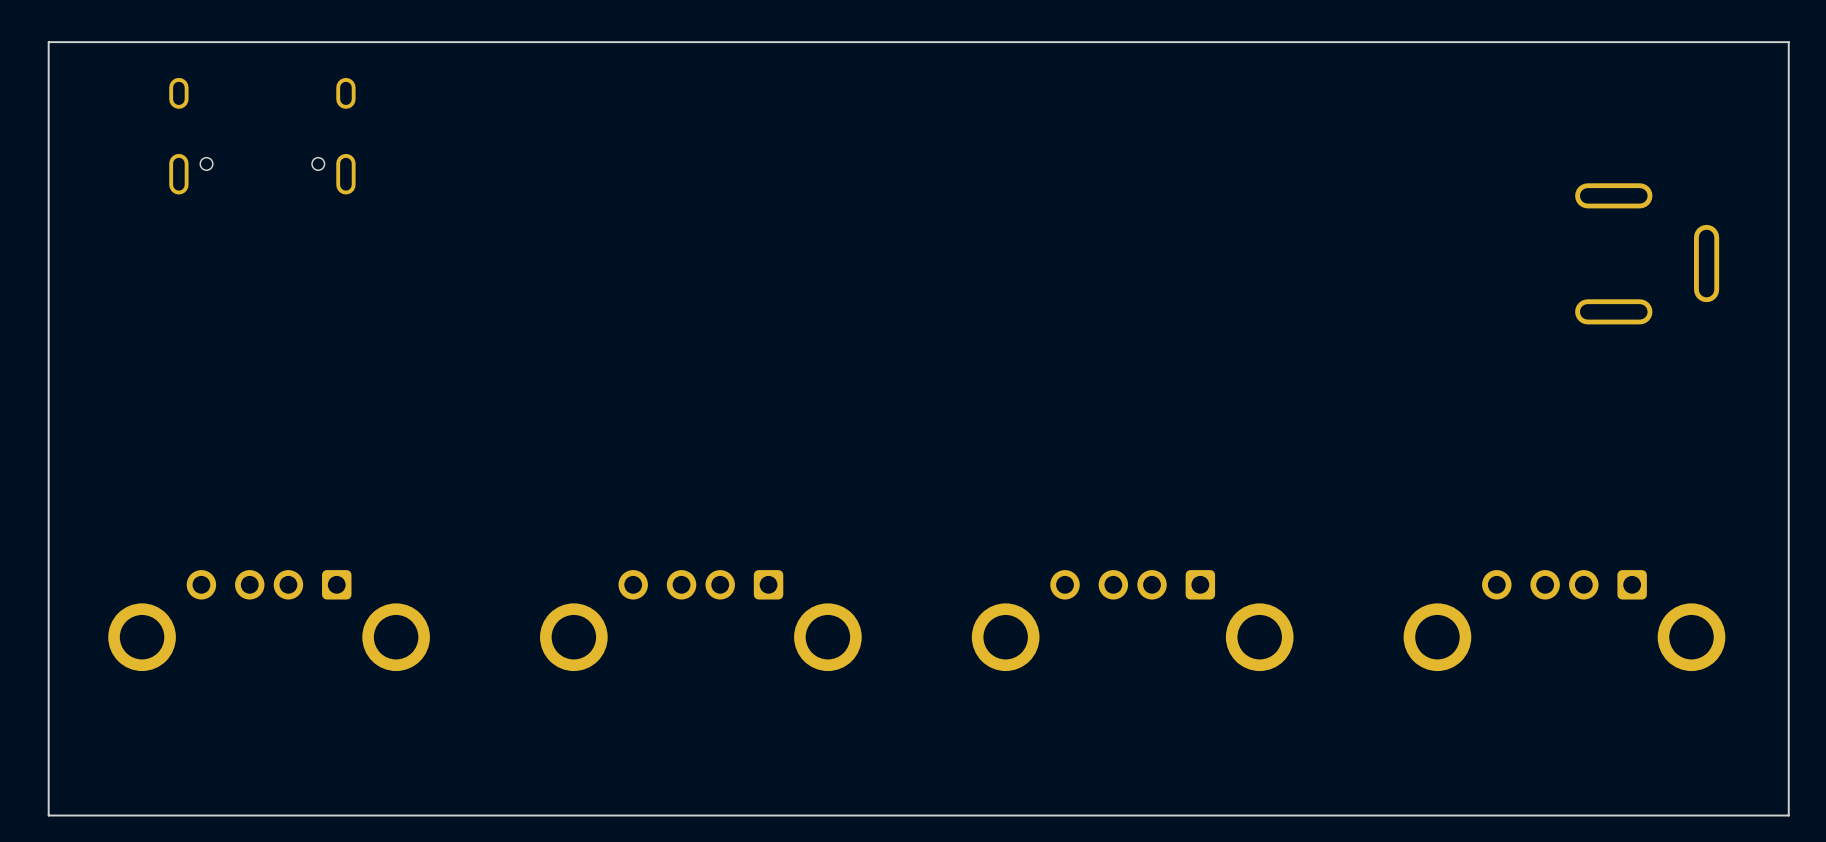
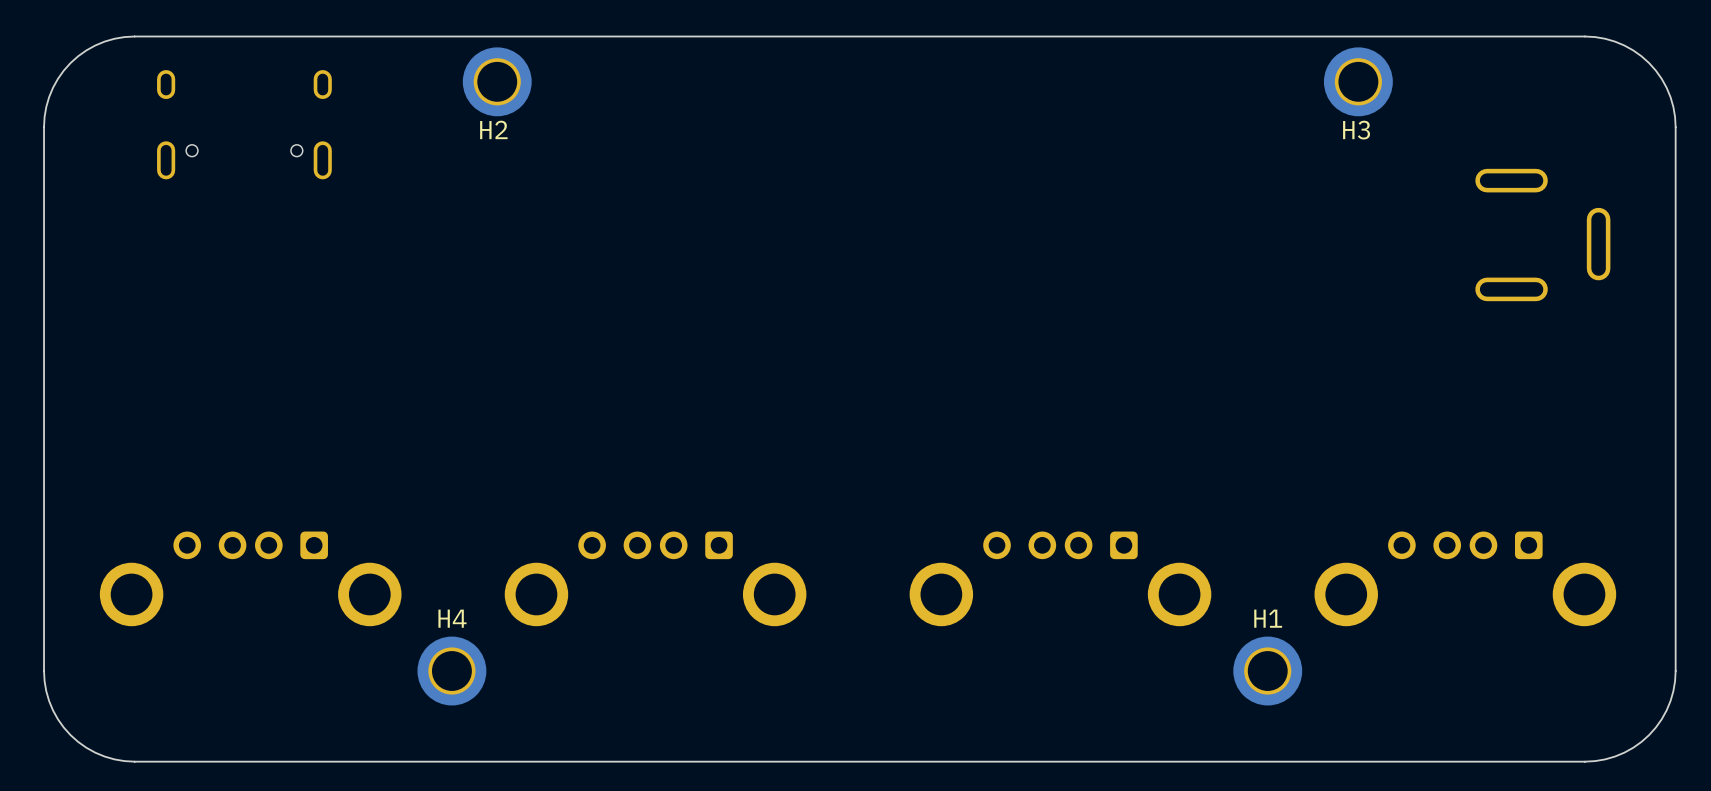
board edge: (145, 42) (48, 42) (48, 138) -> (134, 36) (114, 38) (95, 45) (70, 63) (57, 78) (49, 97) (44, 127)
board edge: (1692, 42) (1788, 42) (1788, 138) -> (1585, 36) (1614, 41) (1633, 50) (1649, 63) (1661, 78) (1670, 97) (1675, 127)
H2: none -> (497, 81)
H3: none -> (1358, 81)
board edge: (48, 718) (48, 815) (145, 815) -> (44, 671) (49, 700) (57, 719) (70, 735) (86, 747) (104, 756) (134, 761)
H4: none -> (451, 671)
H1: none -> (1267, 671)
board edge: (1788, 718) (1788, 815) (1692, 815) -> (1675, 671) (1673, 691) (1666, 710) (1649, 735) (1624, 752) (1605, 759) (1585, 761)

